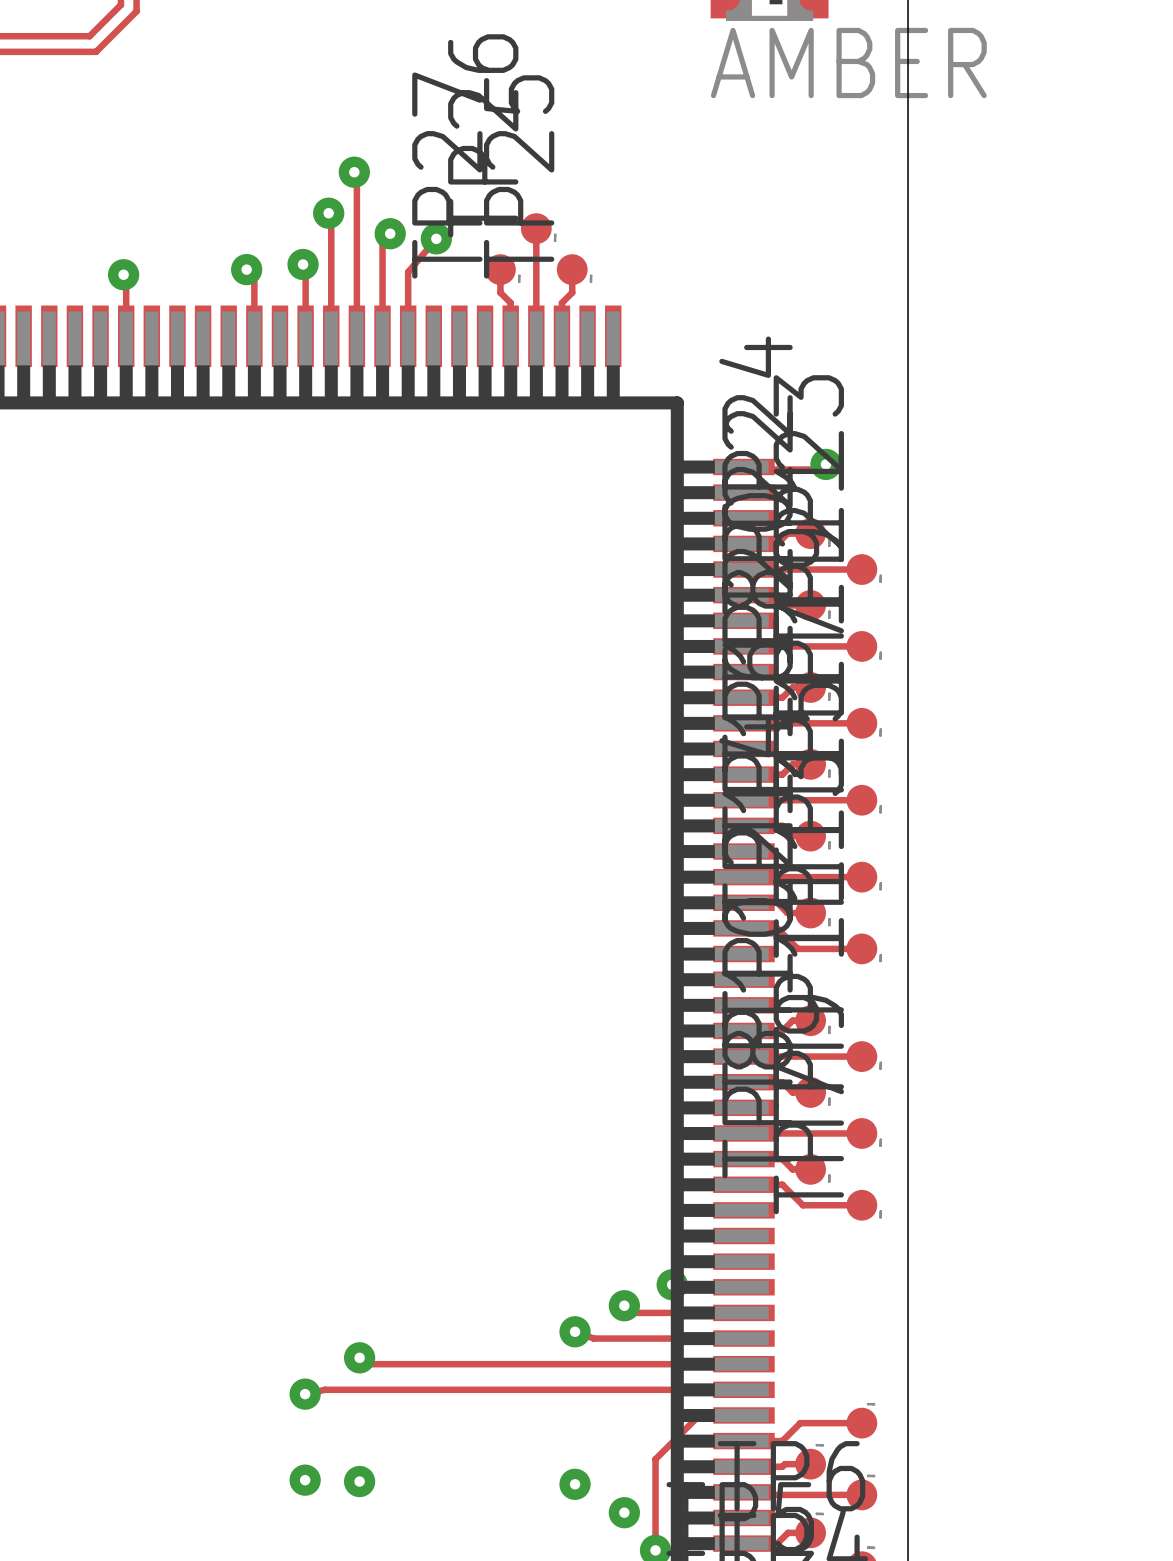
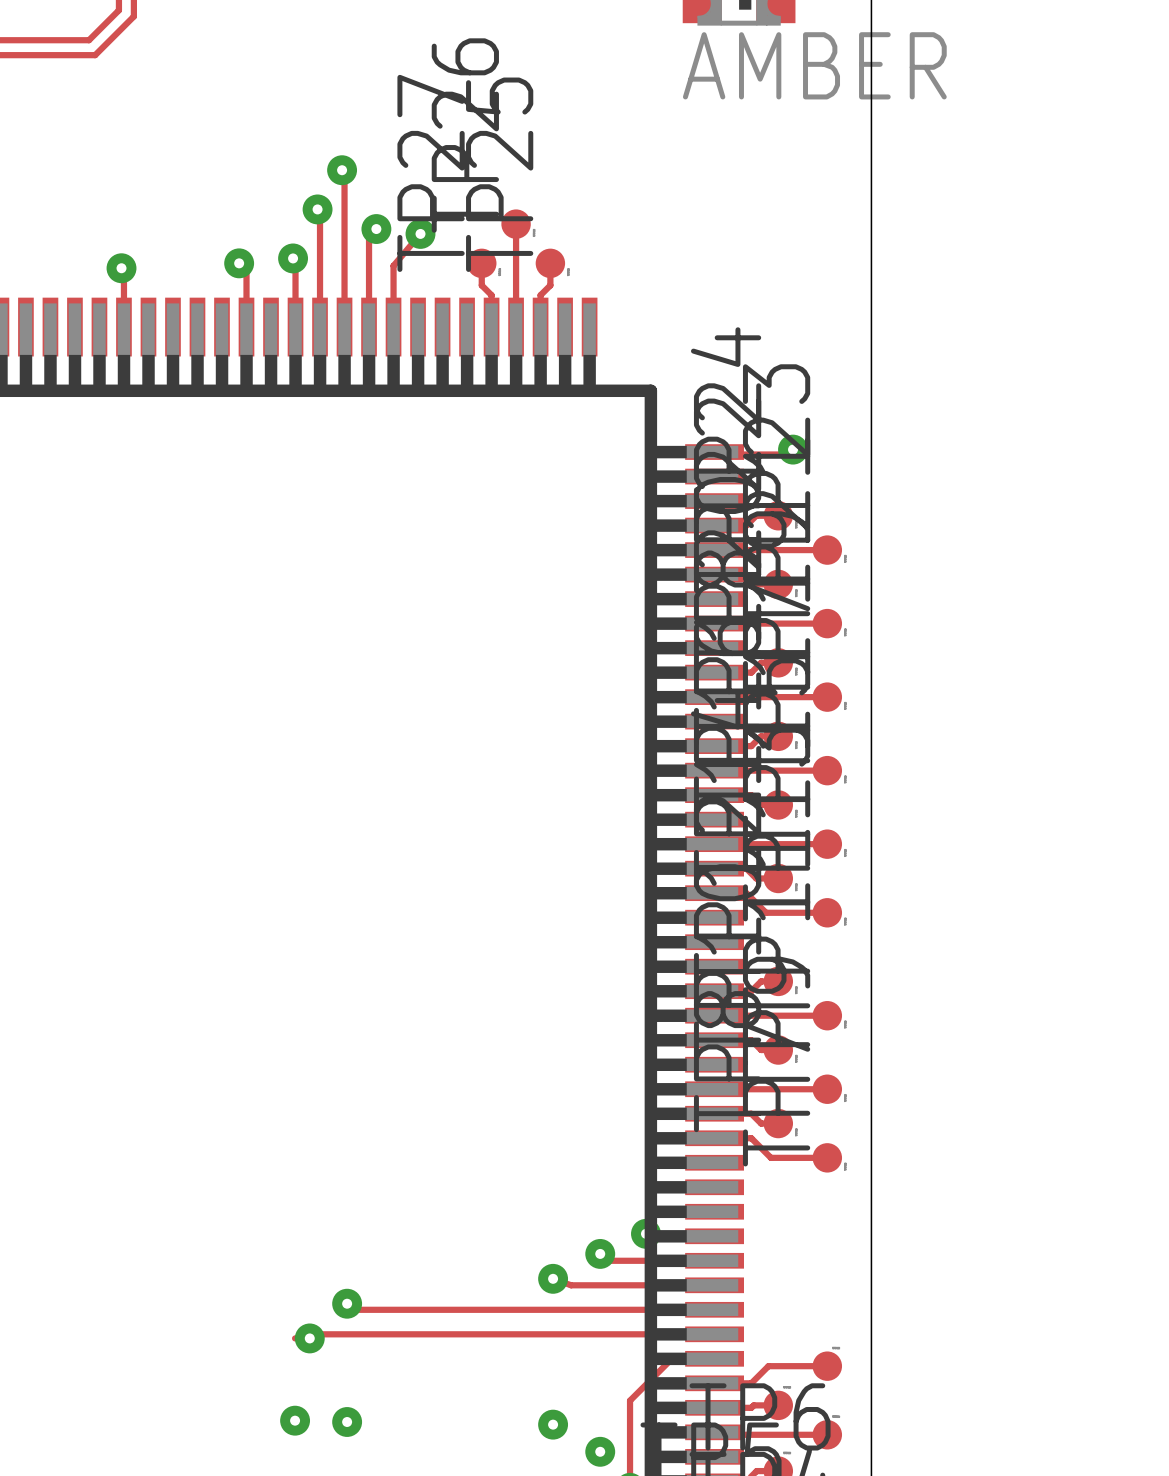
via position: (305, 1394) -> (309, 1338)

